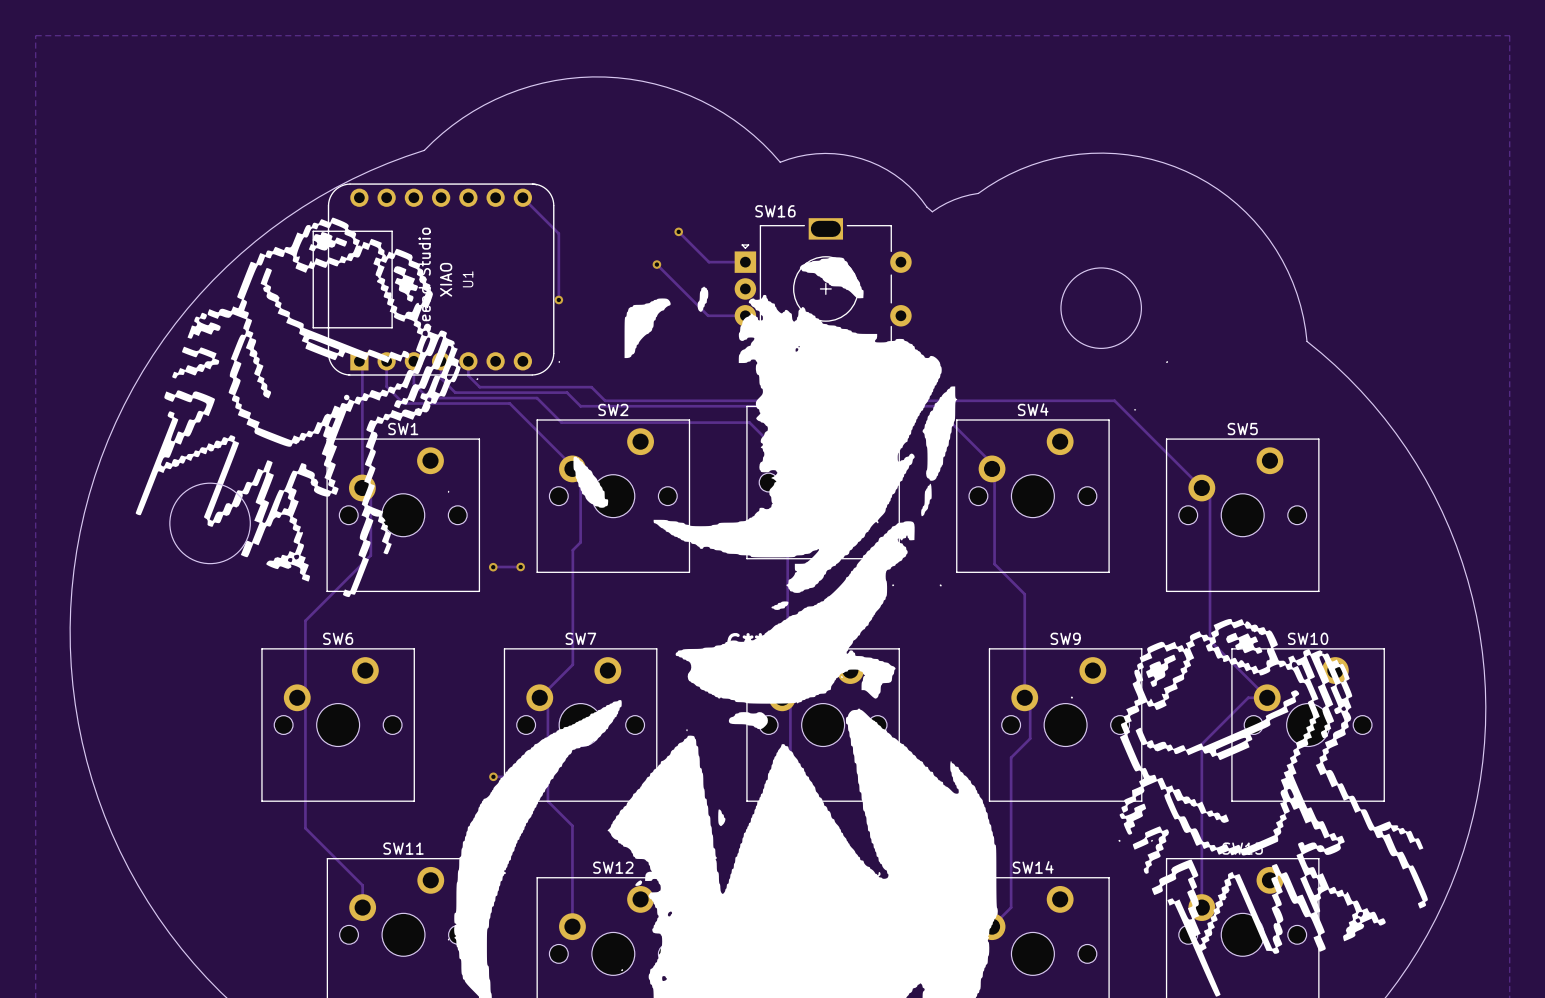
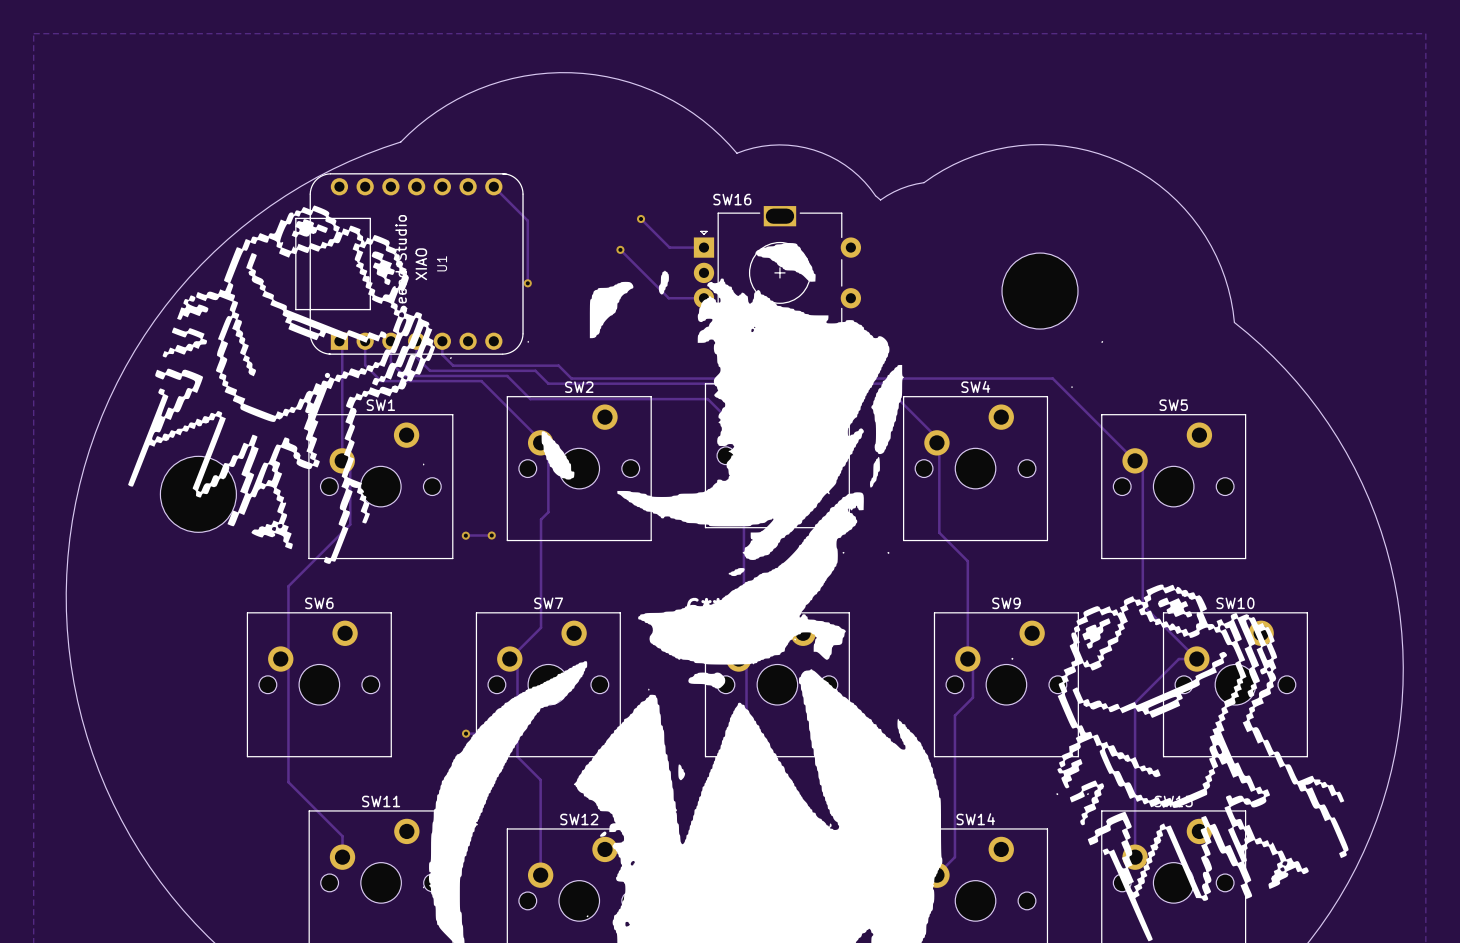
round board edge: [1060, 267, 1142, 349] -> none
part: none -> (1040, 291)
round board edge: [169, 482, 251, 565] -> none
part: none -> (198, 494)

